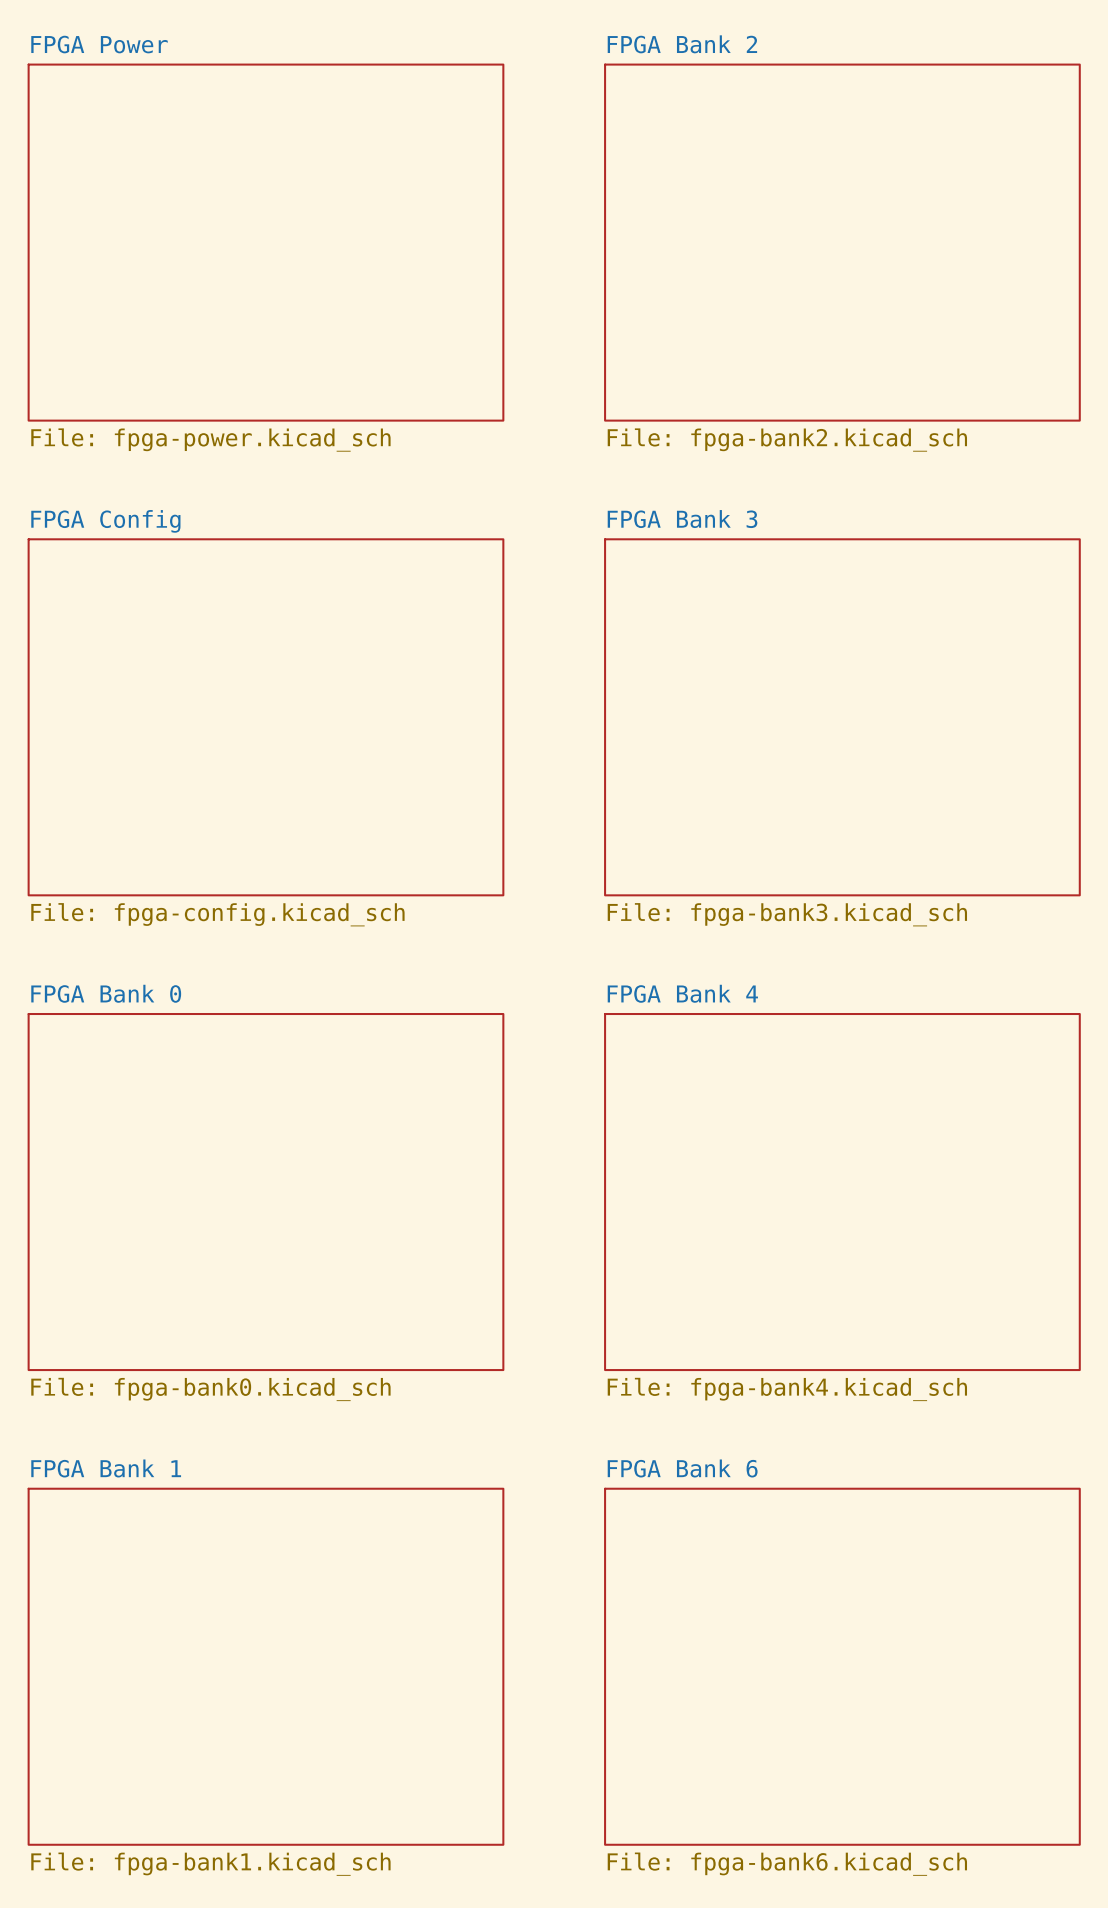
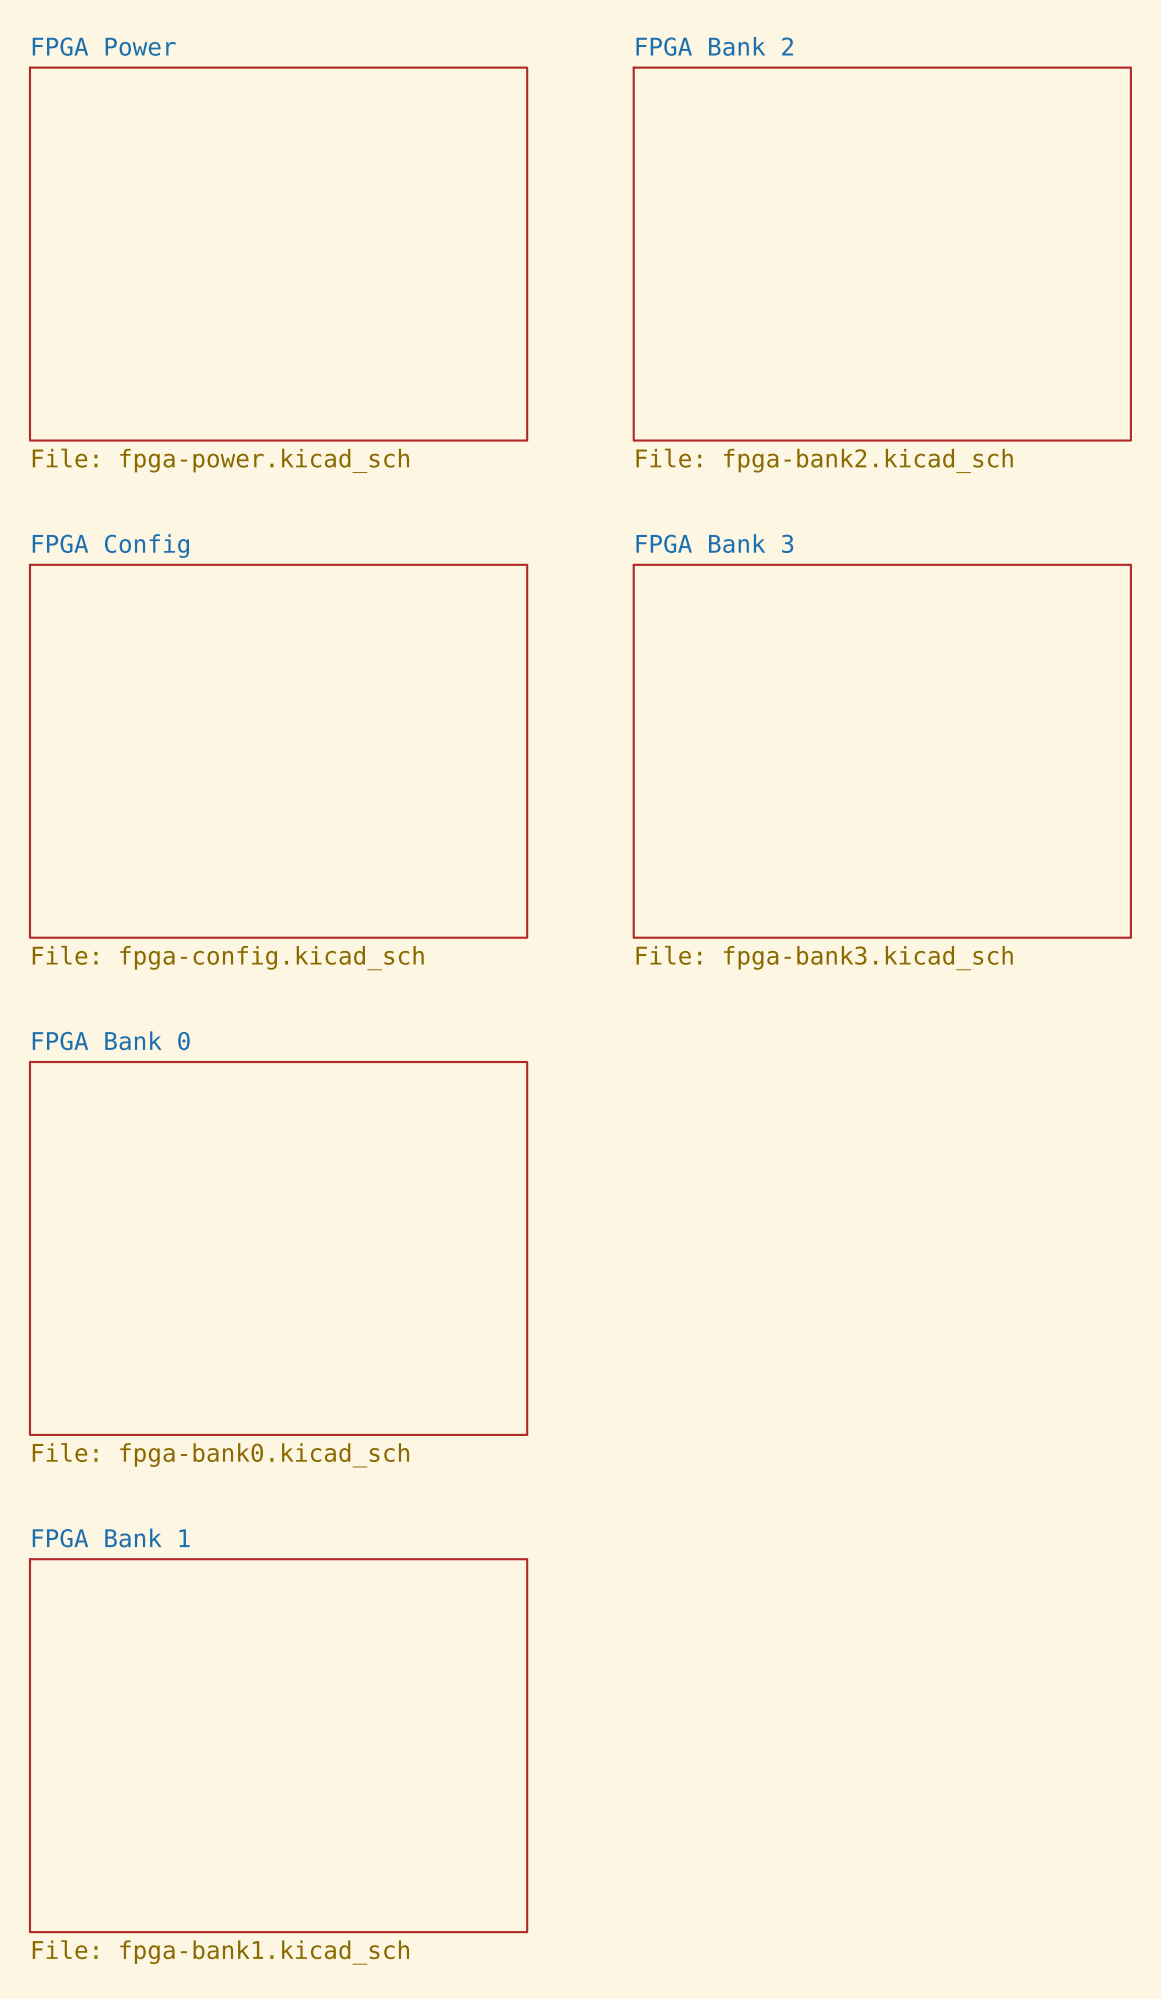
sheet FPGA Bank 4: File: fpga-bank4.kicad_sch (842, 1192) -> none
sheet FPGA Bank 6: File: fpga-bank6.kicad_sch (842, 1666) -> none

